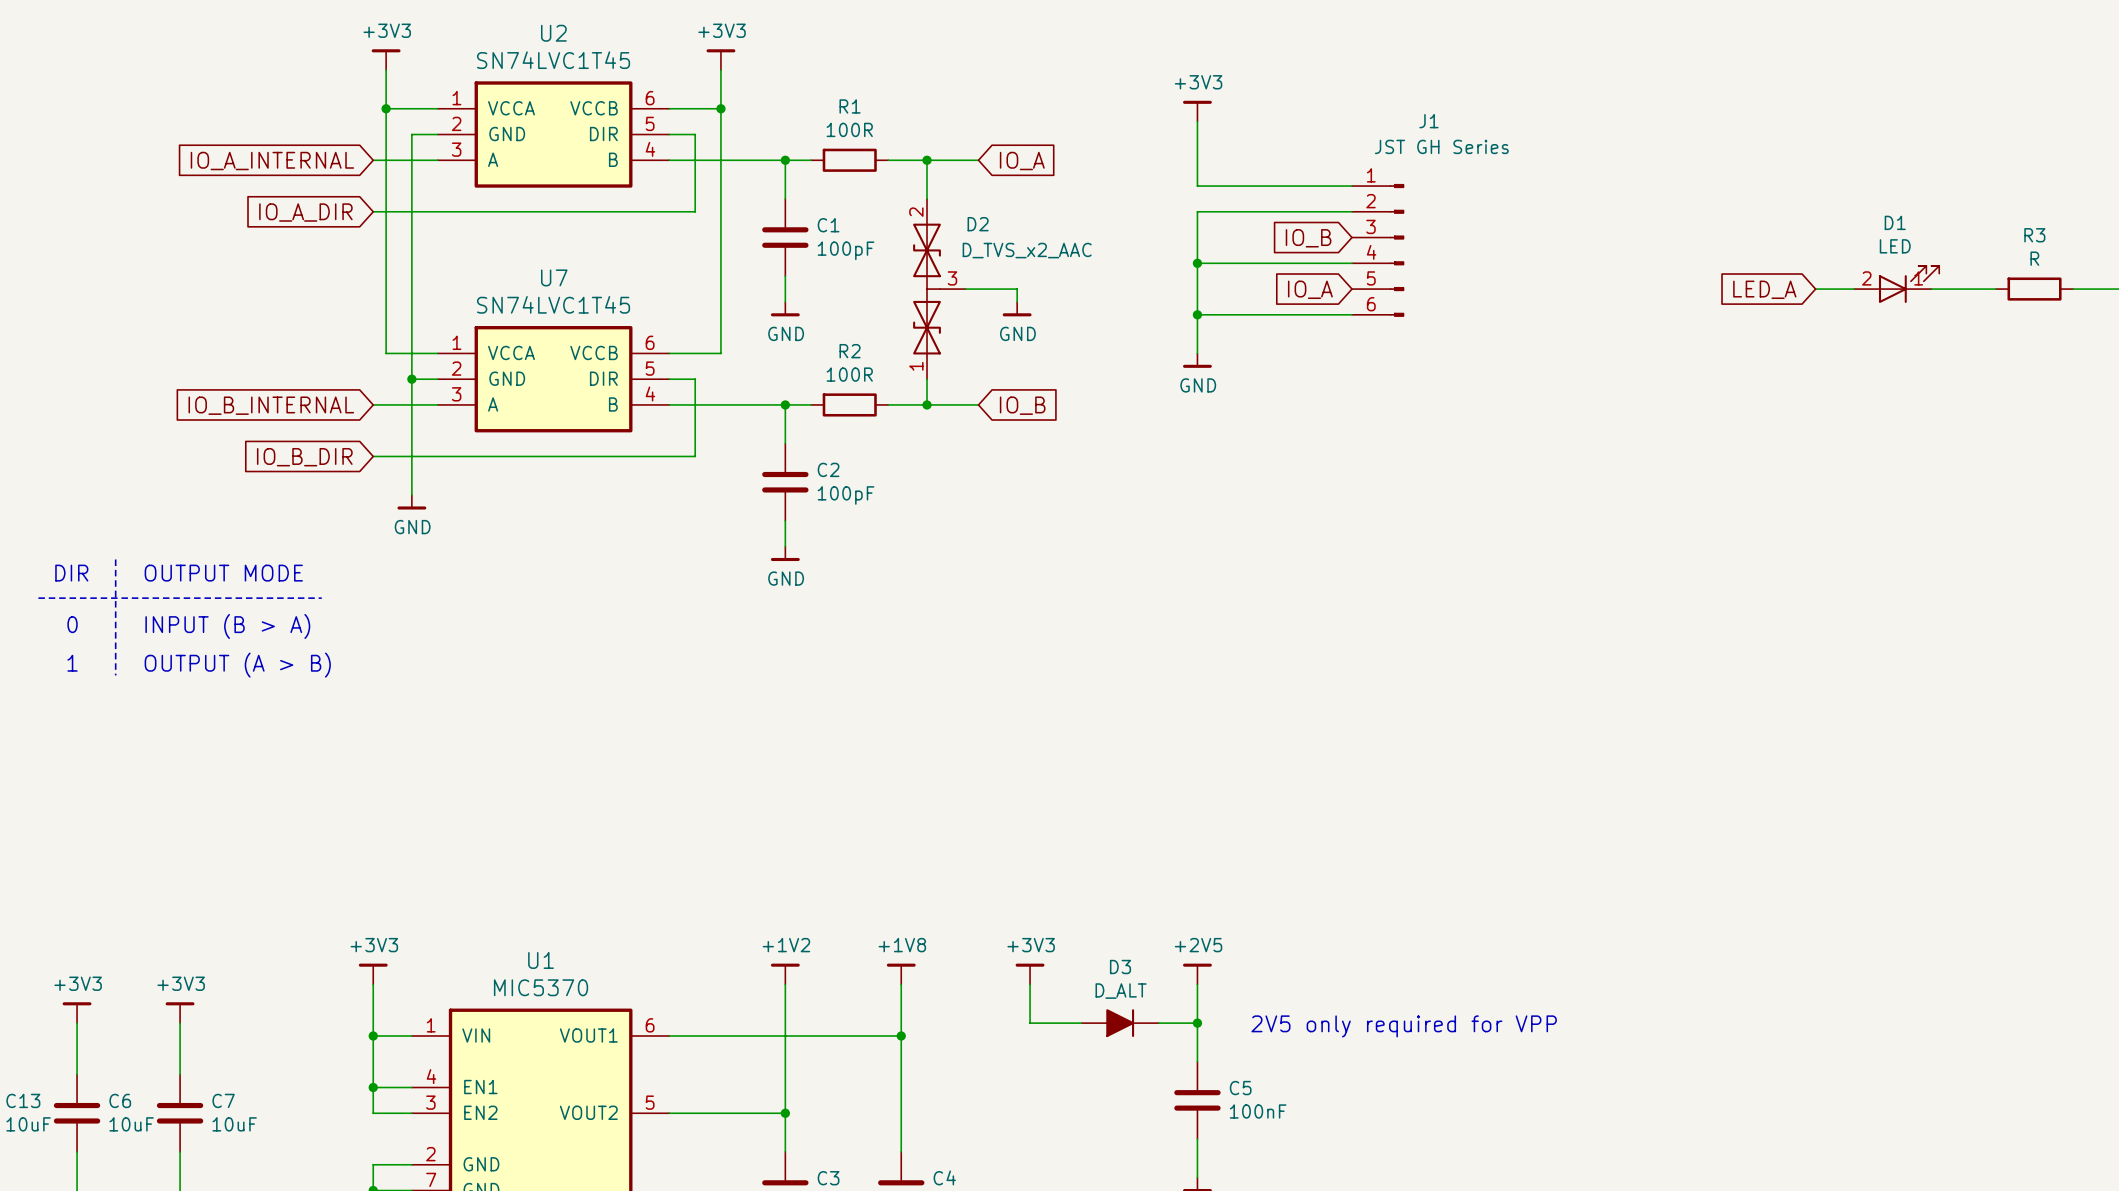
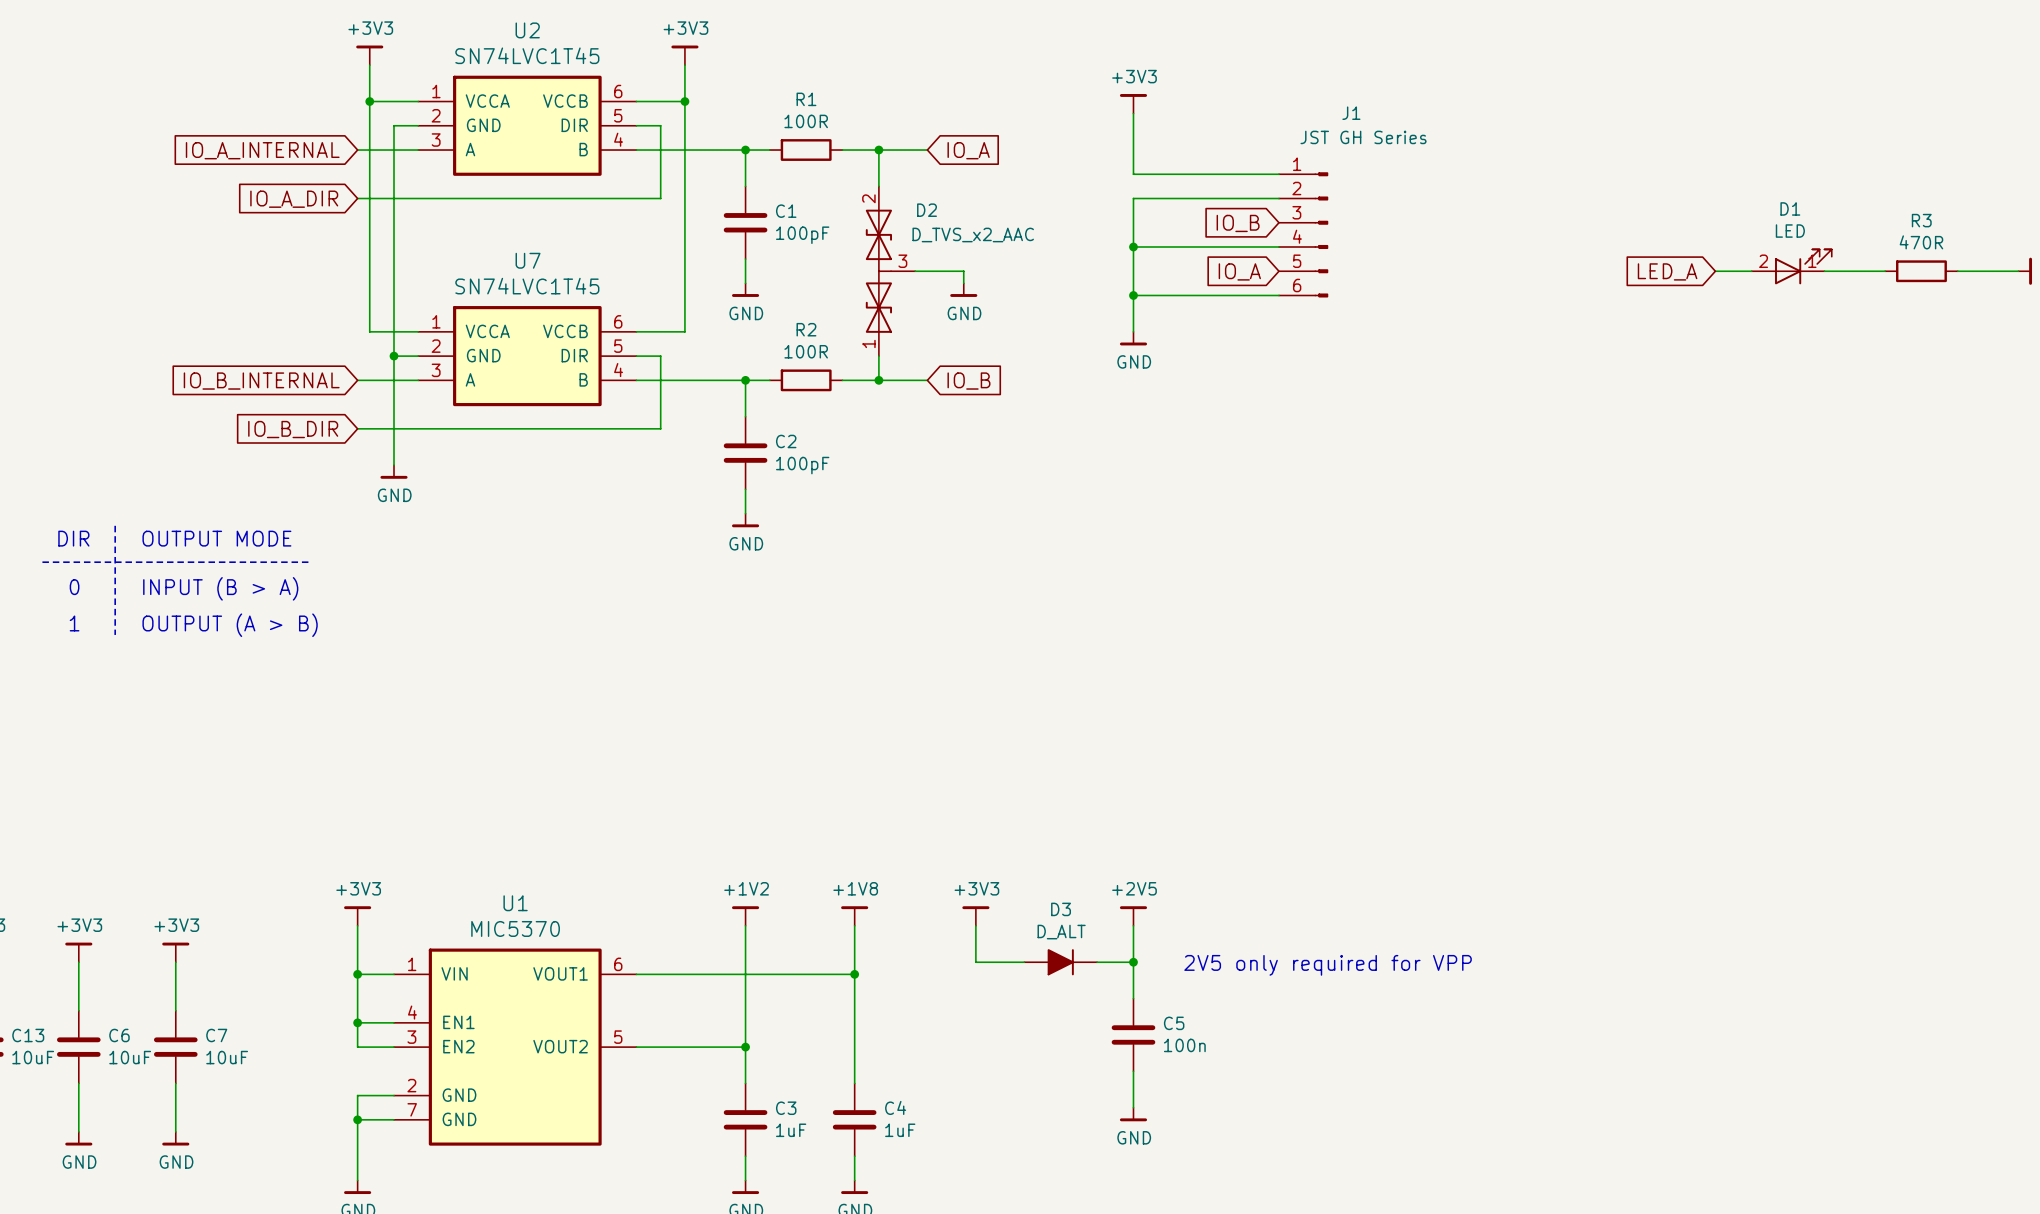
R3 value: R (2034, 258) -> 470R (1921, 242)
C5 value: 100nF (1258, 1111) -> 100n (1184, 1045)

